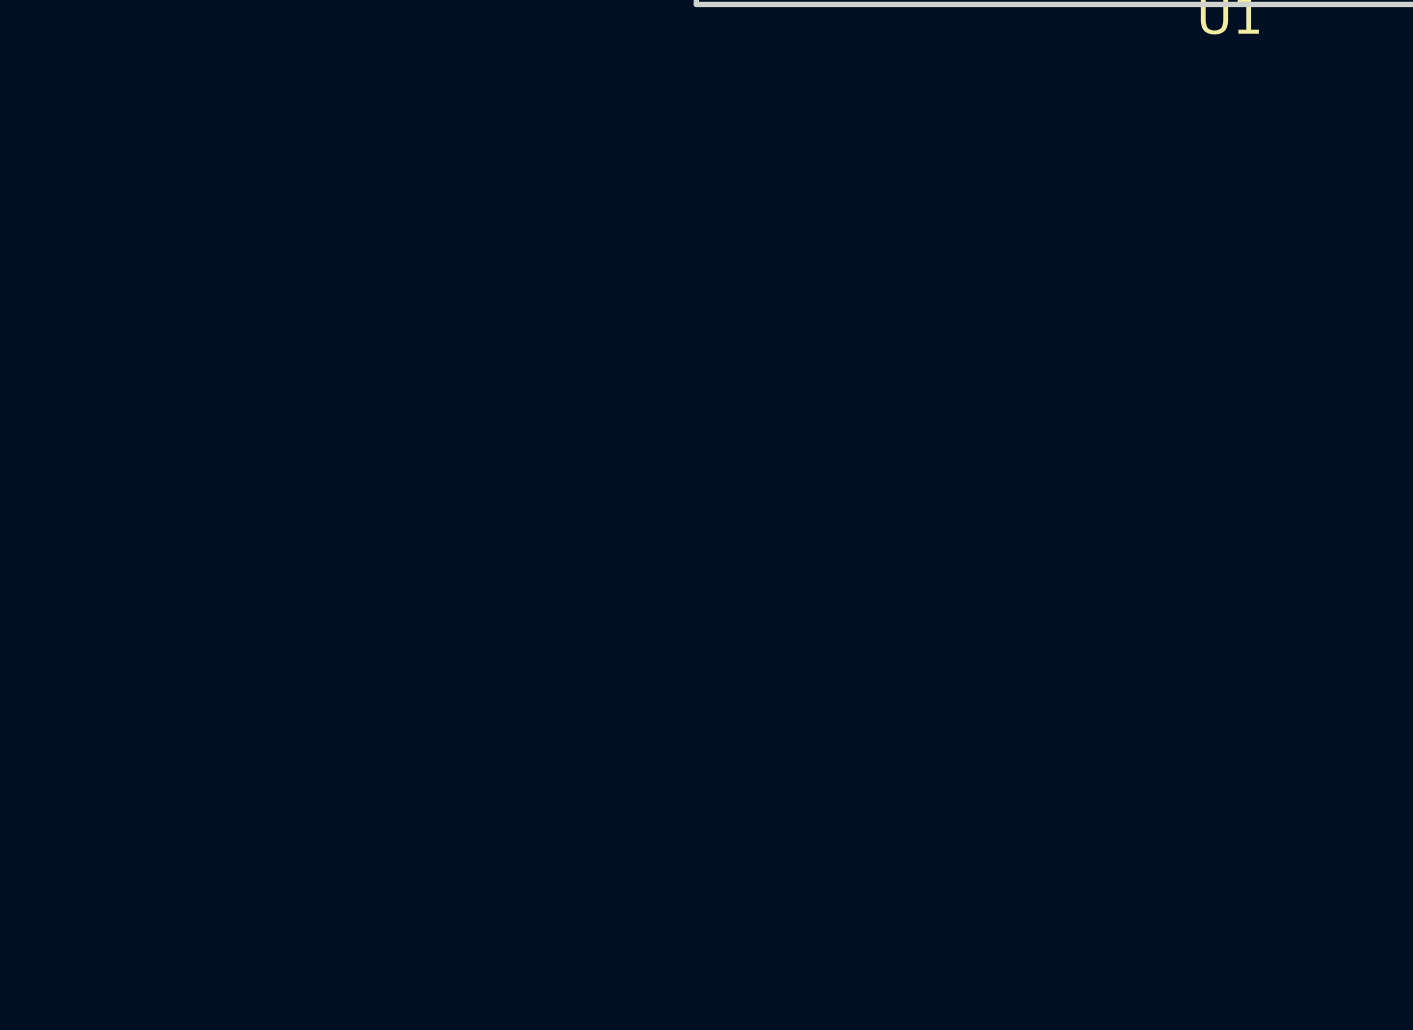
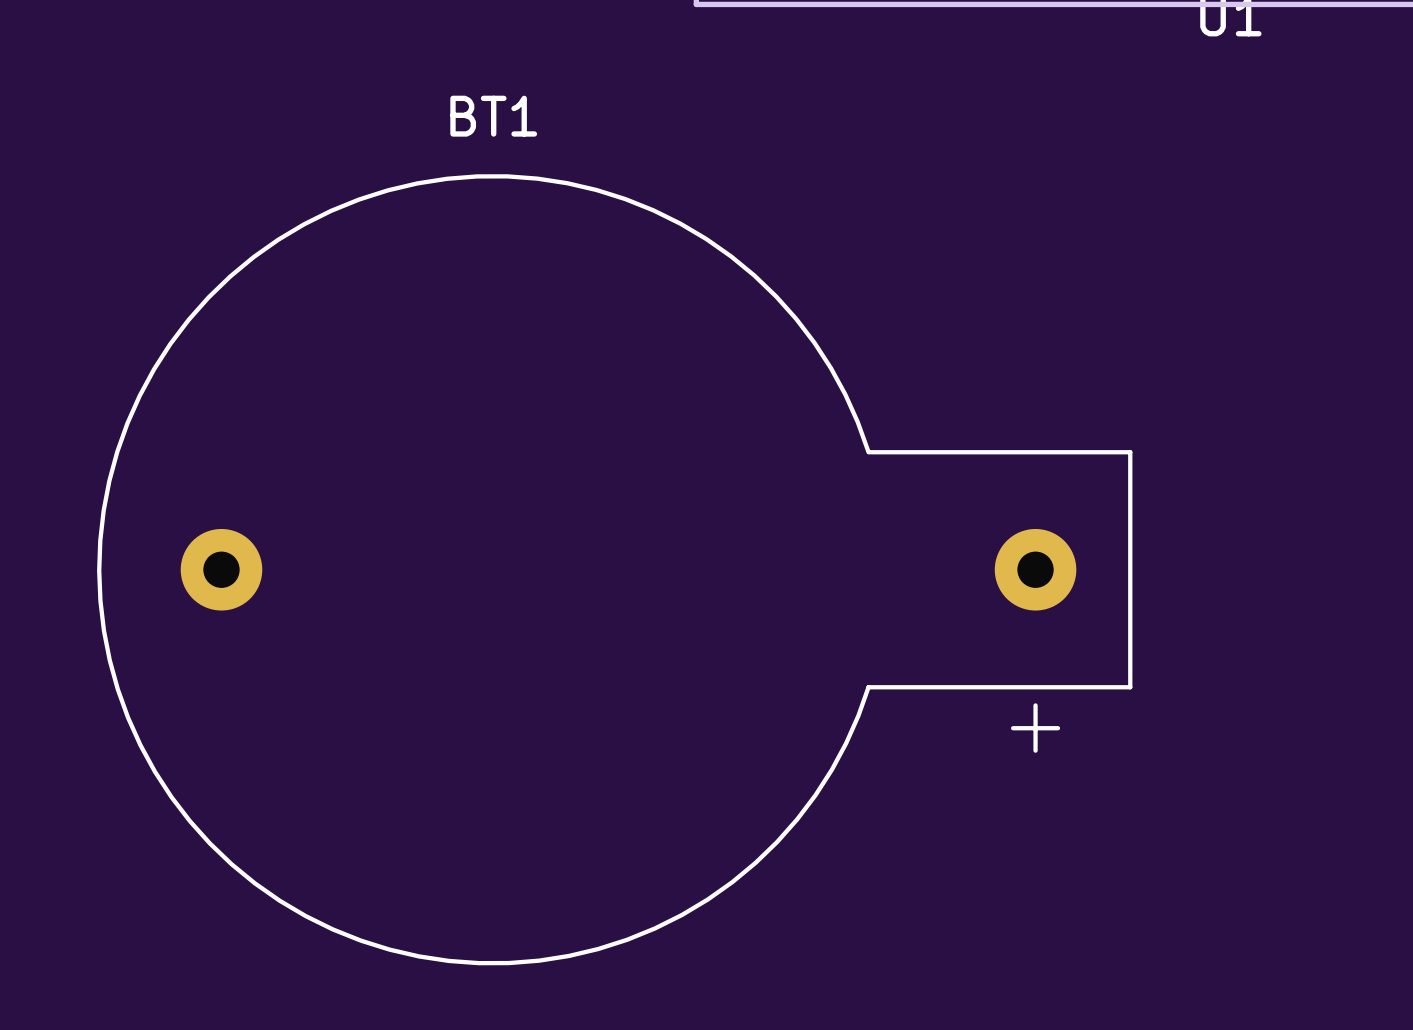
BT1: none -> (614, 569)

